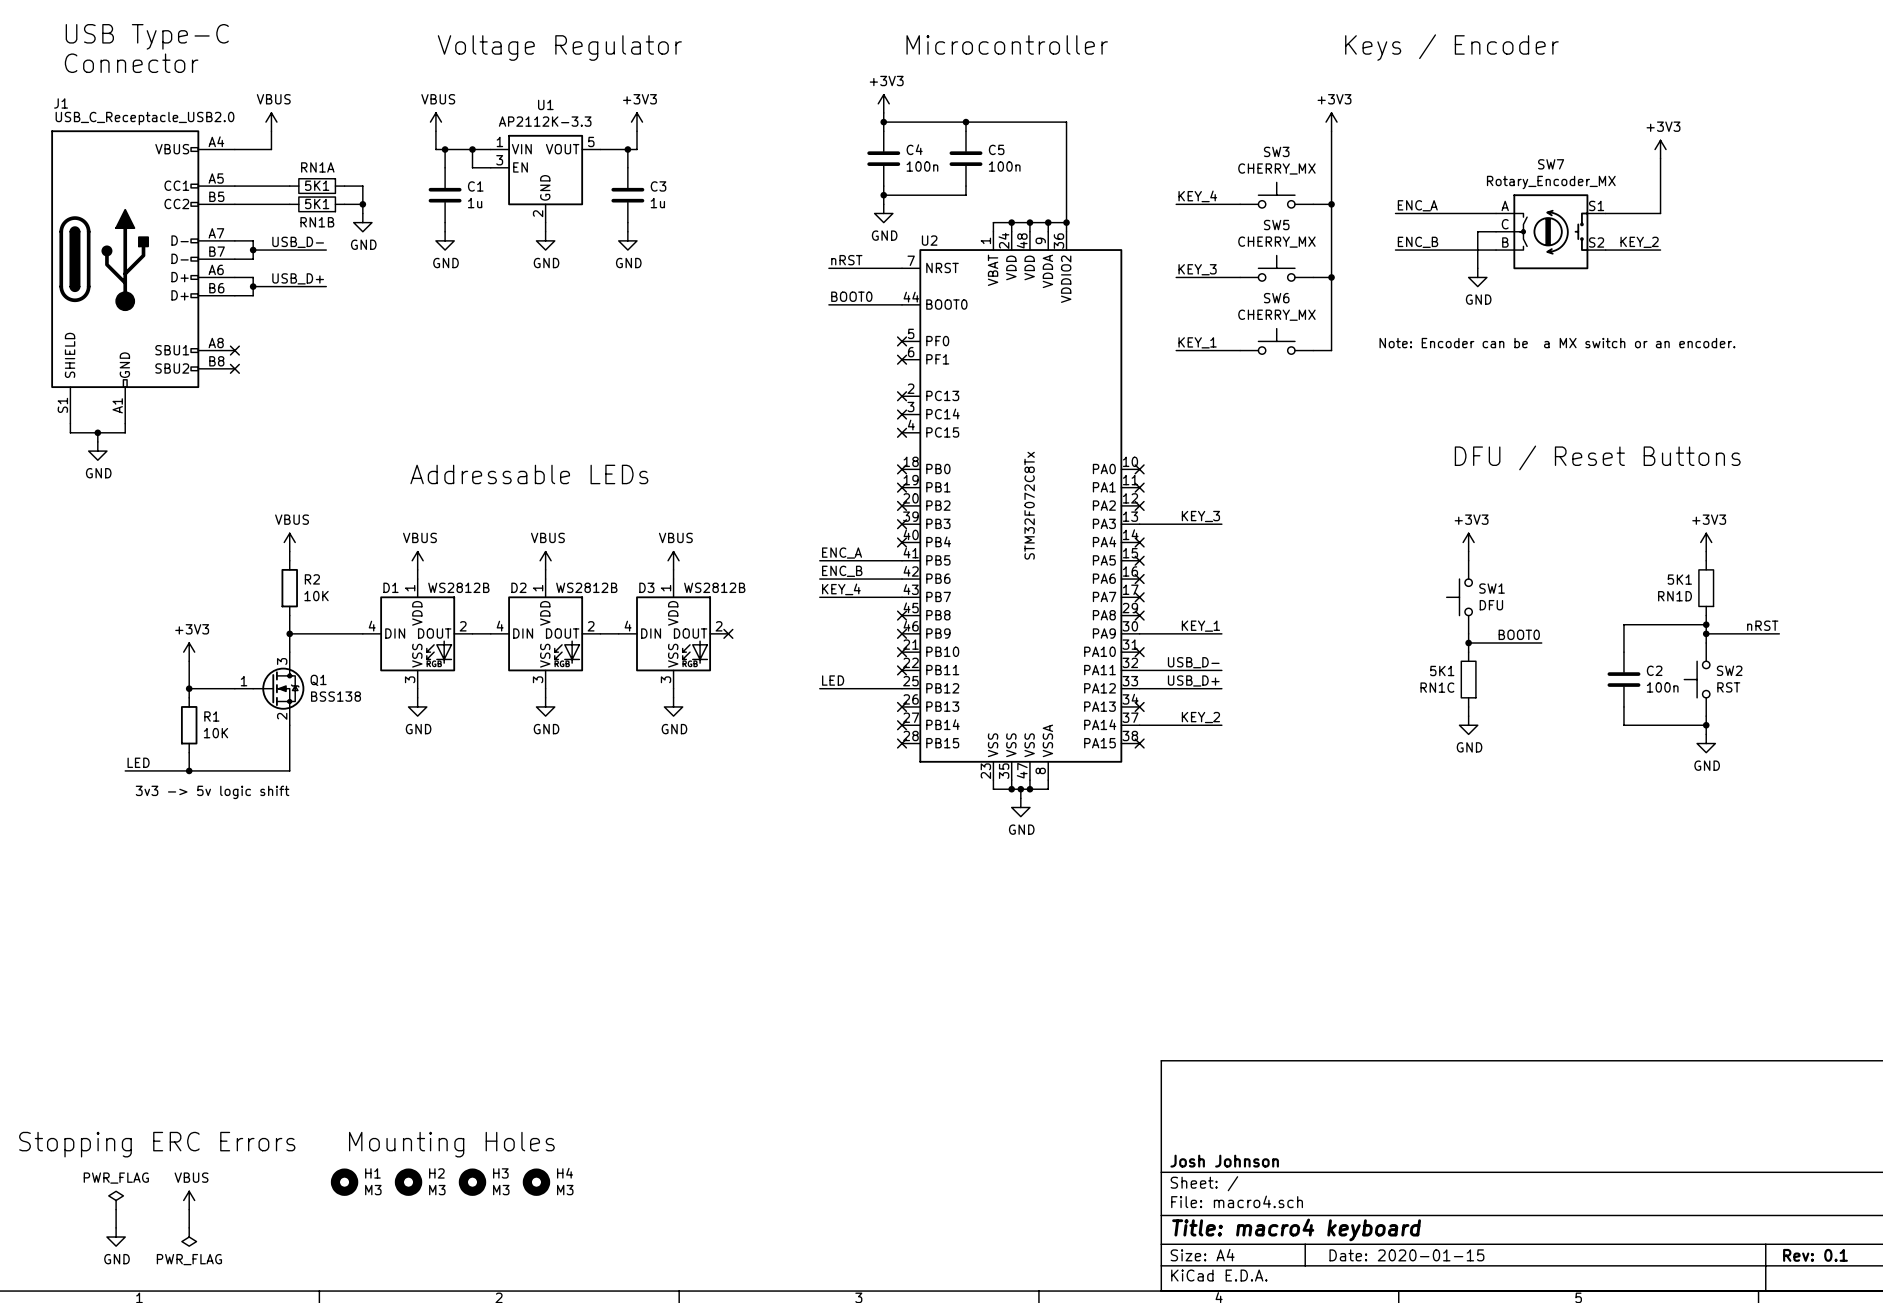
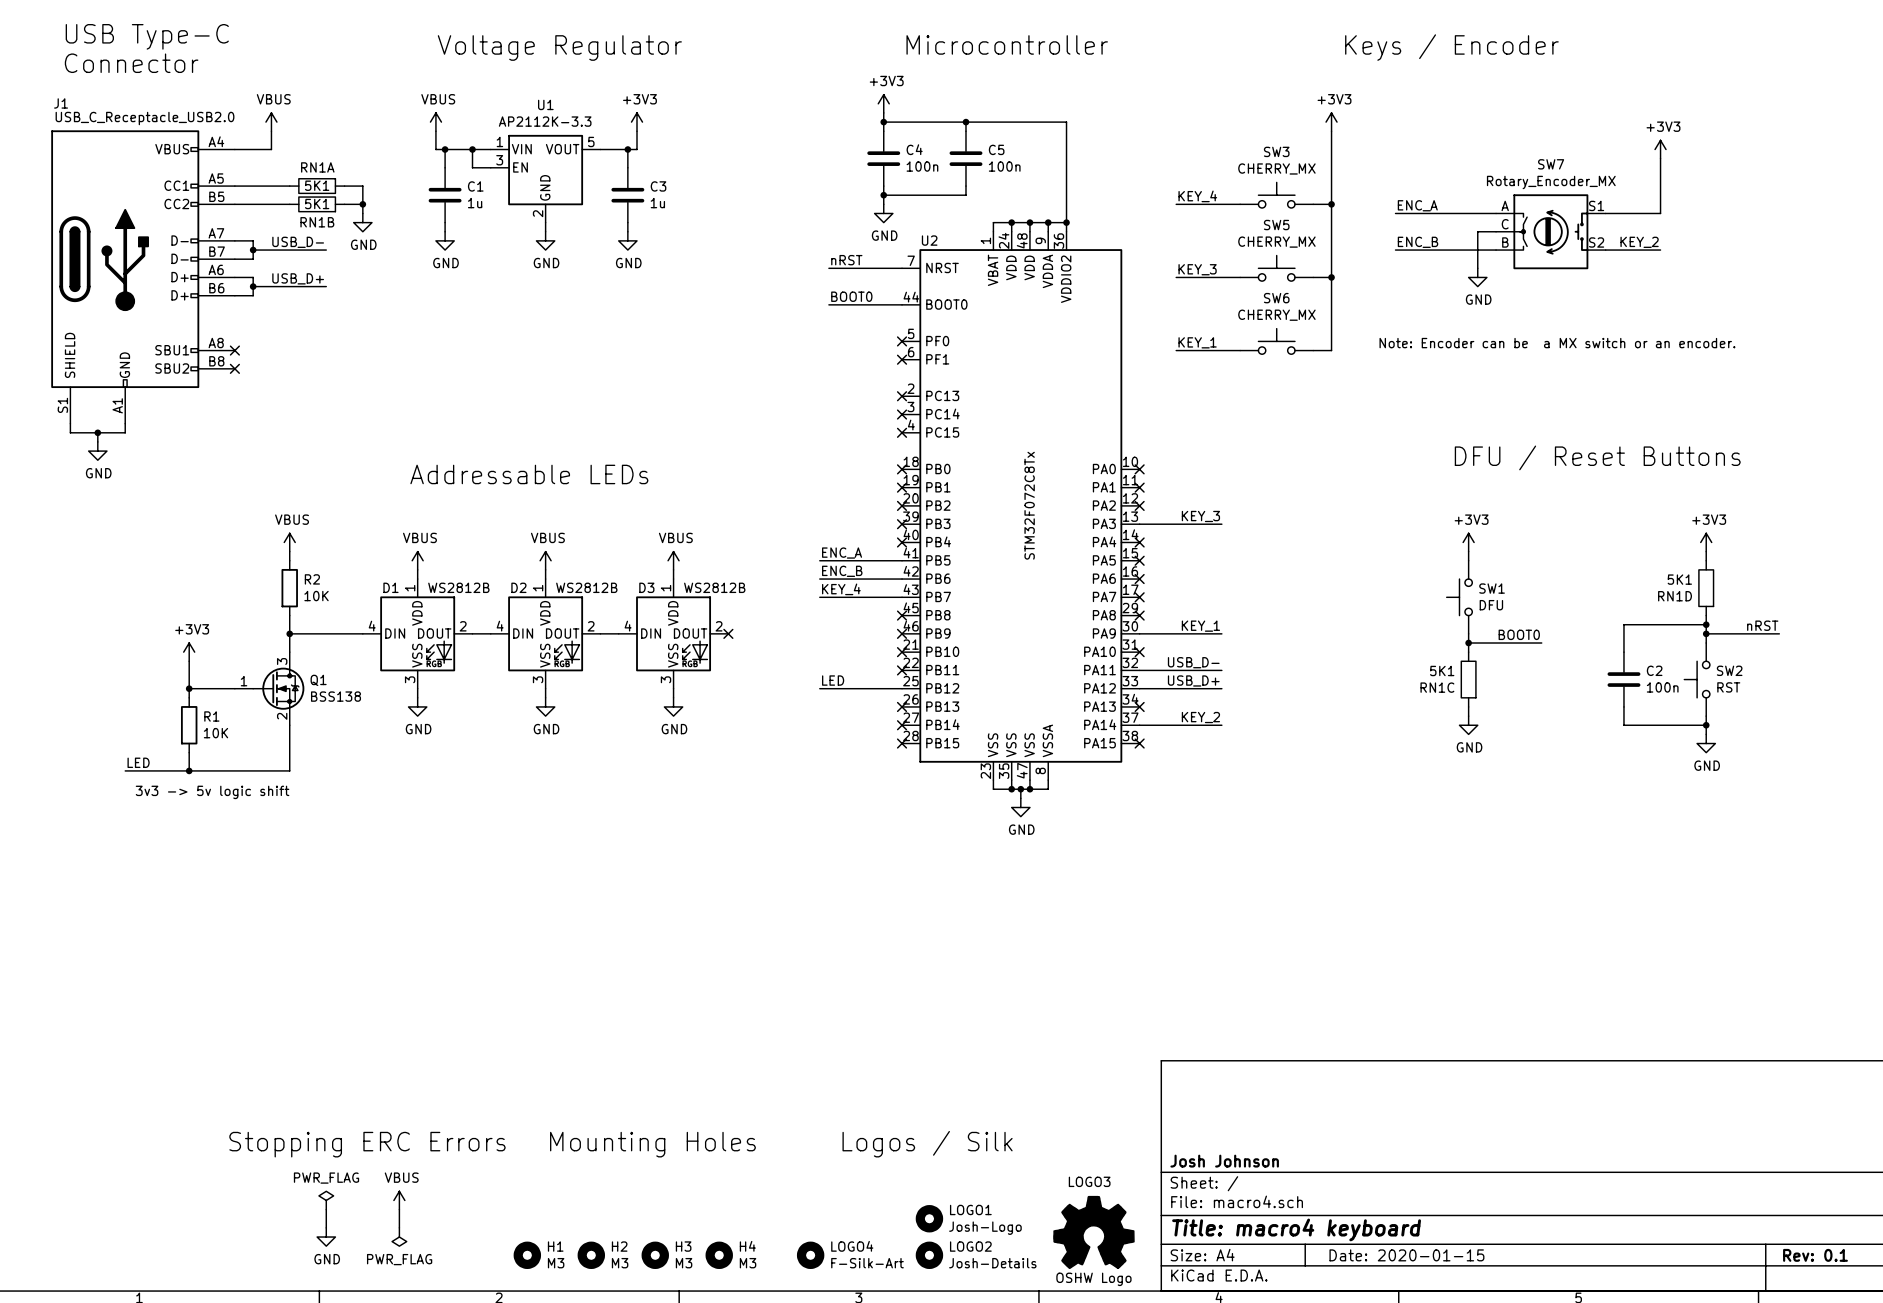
text: Stopping ERC Errors (157, 1144) -> none
text: none -> Stopping ERC Errors (367, 1144)
text: Mounting Holes (451, 1144) -> none
text: none -> Mounting Holes (652, 1144)
text: none -> Logos / Silk (927, 1144)
H1 position: (344, 1182) -> (527, 1255)
H2 position: (408, 1182) -> (591, 1255)
H3 position: (472, 1182) -> (655, 1255)
H4 position: (536, 1182) -> (719, 1255)
power symbol: PWR_FLAG (116, 1200) -> none
power symbol: VBUS (189, 1200) -> none
power symbol: none -> PWR_FLAG (326, 1200)
power symbol: none -> VBUS (399, 1200)
wire: (116, 1209) (116, 1227) -> none
wire: (189, 1209) (189, 1227) -> (326, 1209) (326, 1227)
wire: none -> (399, 1209) (399, 1227)
LOGO1: none -> Josh-Logo (929, 1218)
LOGO3: none -> OSHW Logo (1093, 1232)
power symbol: GND (116, 1237) -> none
power symbol: PWR_FLAG (189, 1237) -> none
power symbol: none -> GND (326, 1237)
power symbol: none -> PWR_FLAG (399, 1237)
LOGO4: none -> F-Silk-Art (810, 1255)
LOGO2: none -> Josh-Details (929, 1255)

